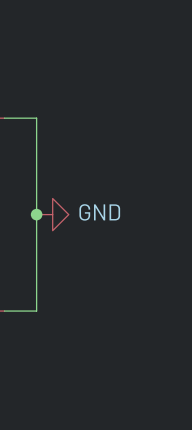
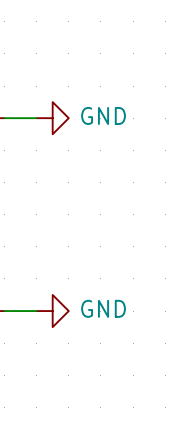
wire: (36, 118) (36, 311) -> none
power symbol: none -> GND (52, 118)
junction: (36, 214) -> none
power symbol: GND (52, 214) -> none
power symbol: none -> GND (52, 311)

